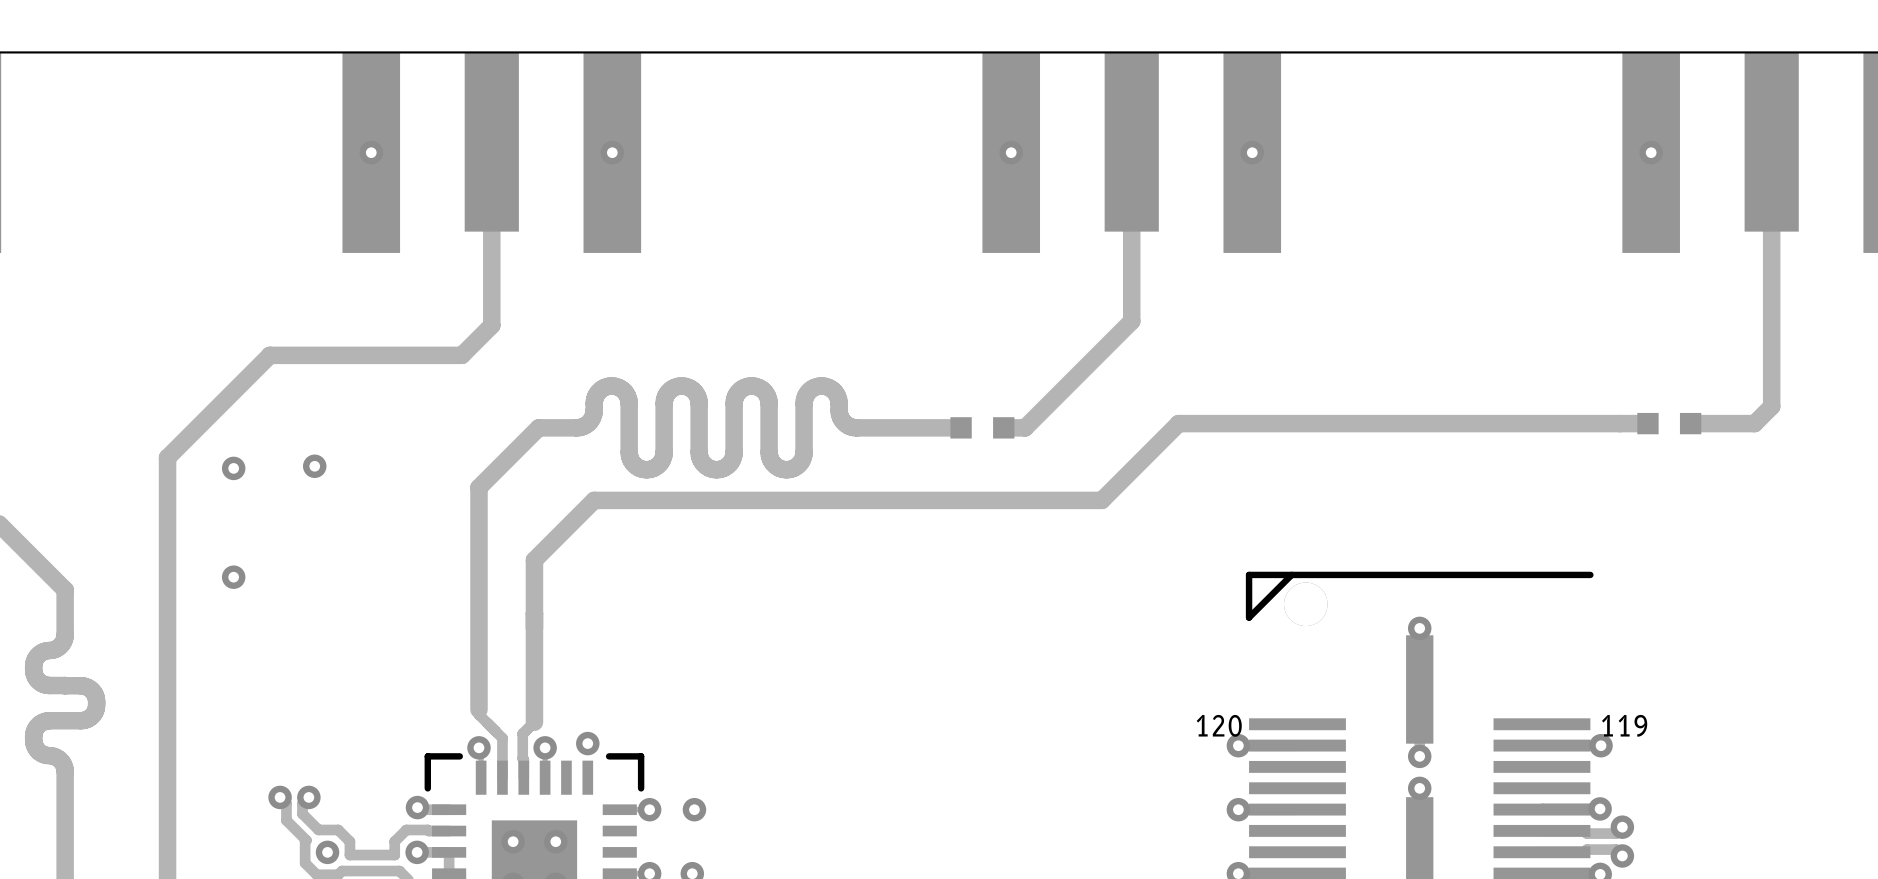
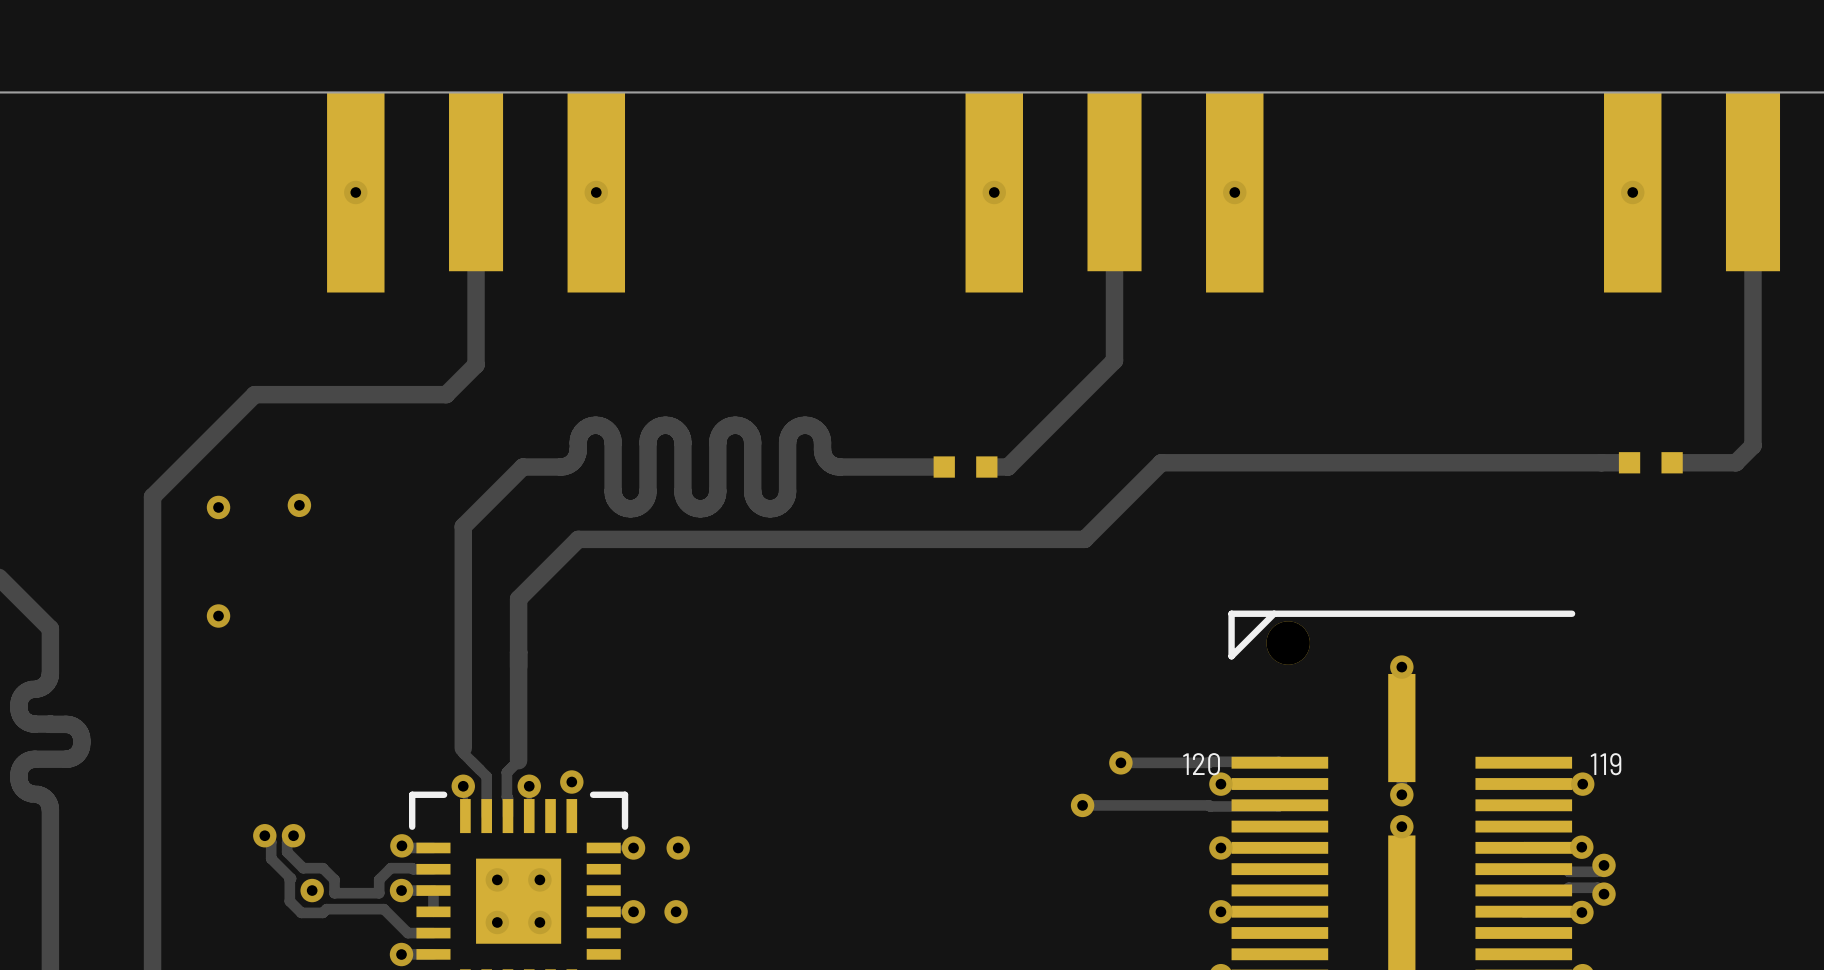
track: none -> (1120, 762) (1279, 762)
via: none -> (1120, 762)
track: none -> (1082, 805) (1279, 805)
via: none -> (1082, 805)

